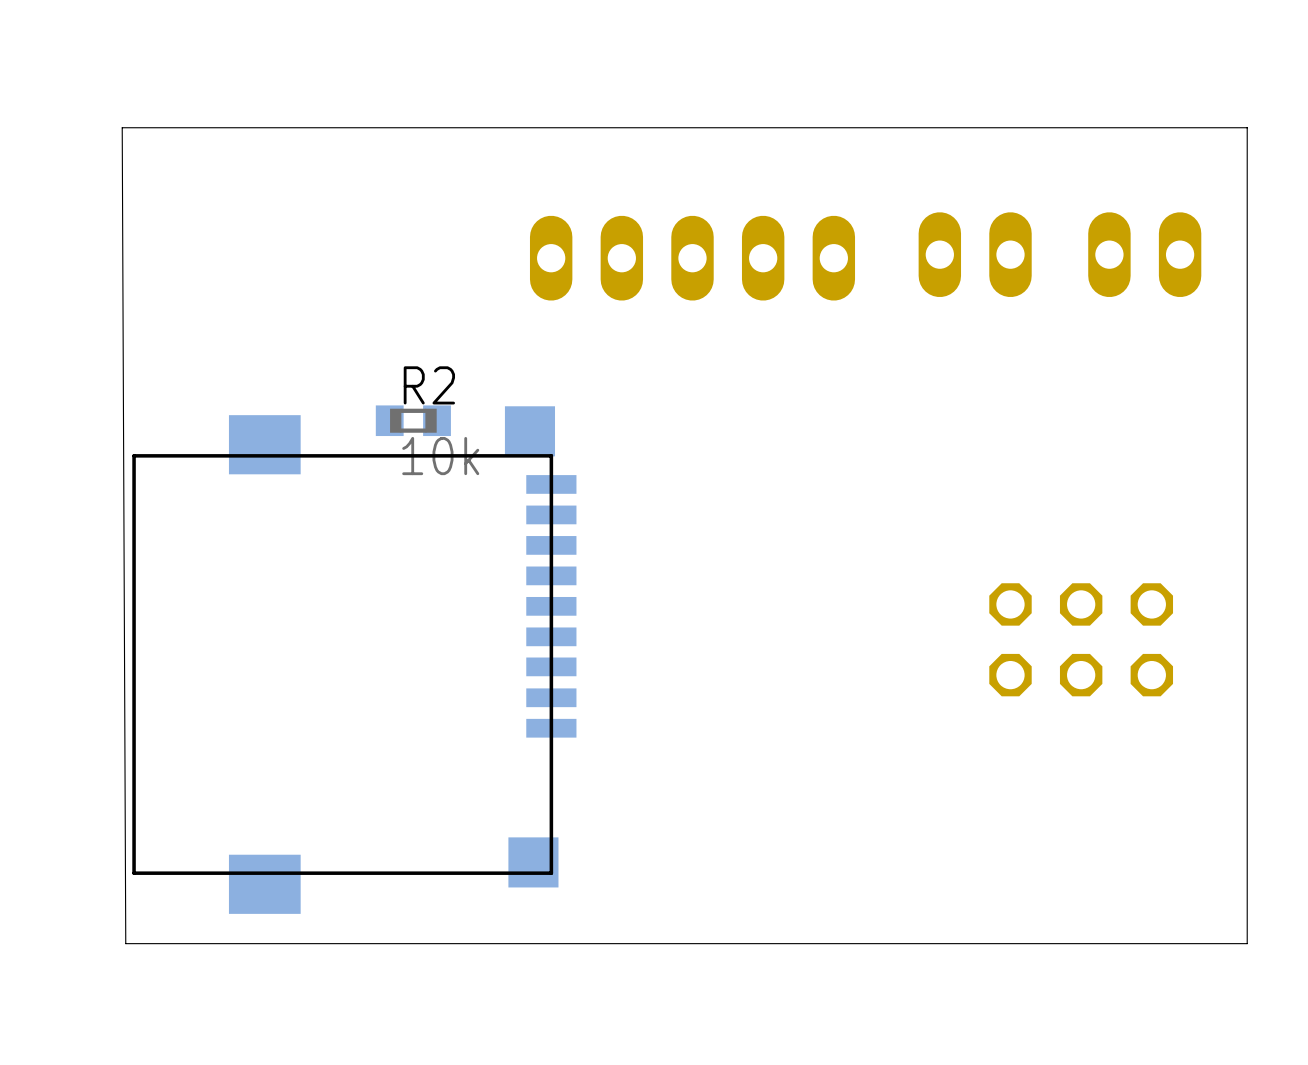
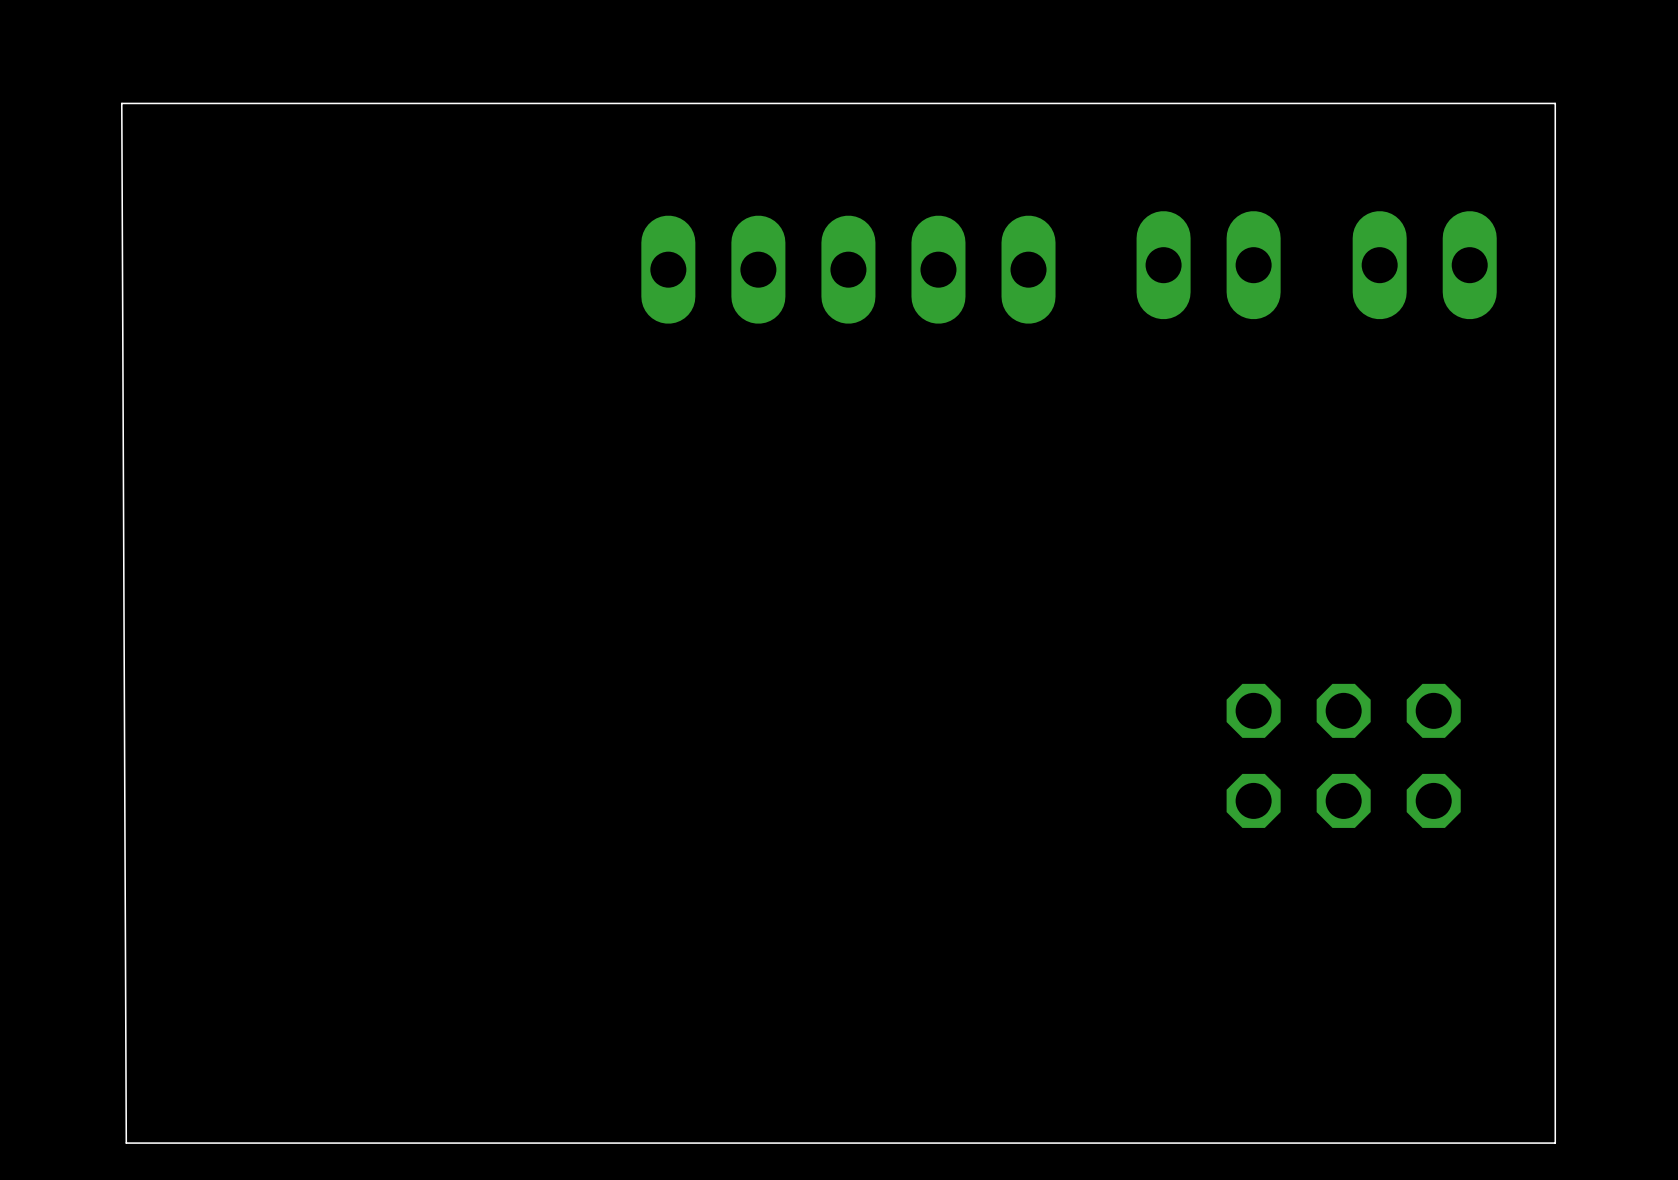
R2: 10k (413, 420) -> none
part: (354, 660) -> none

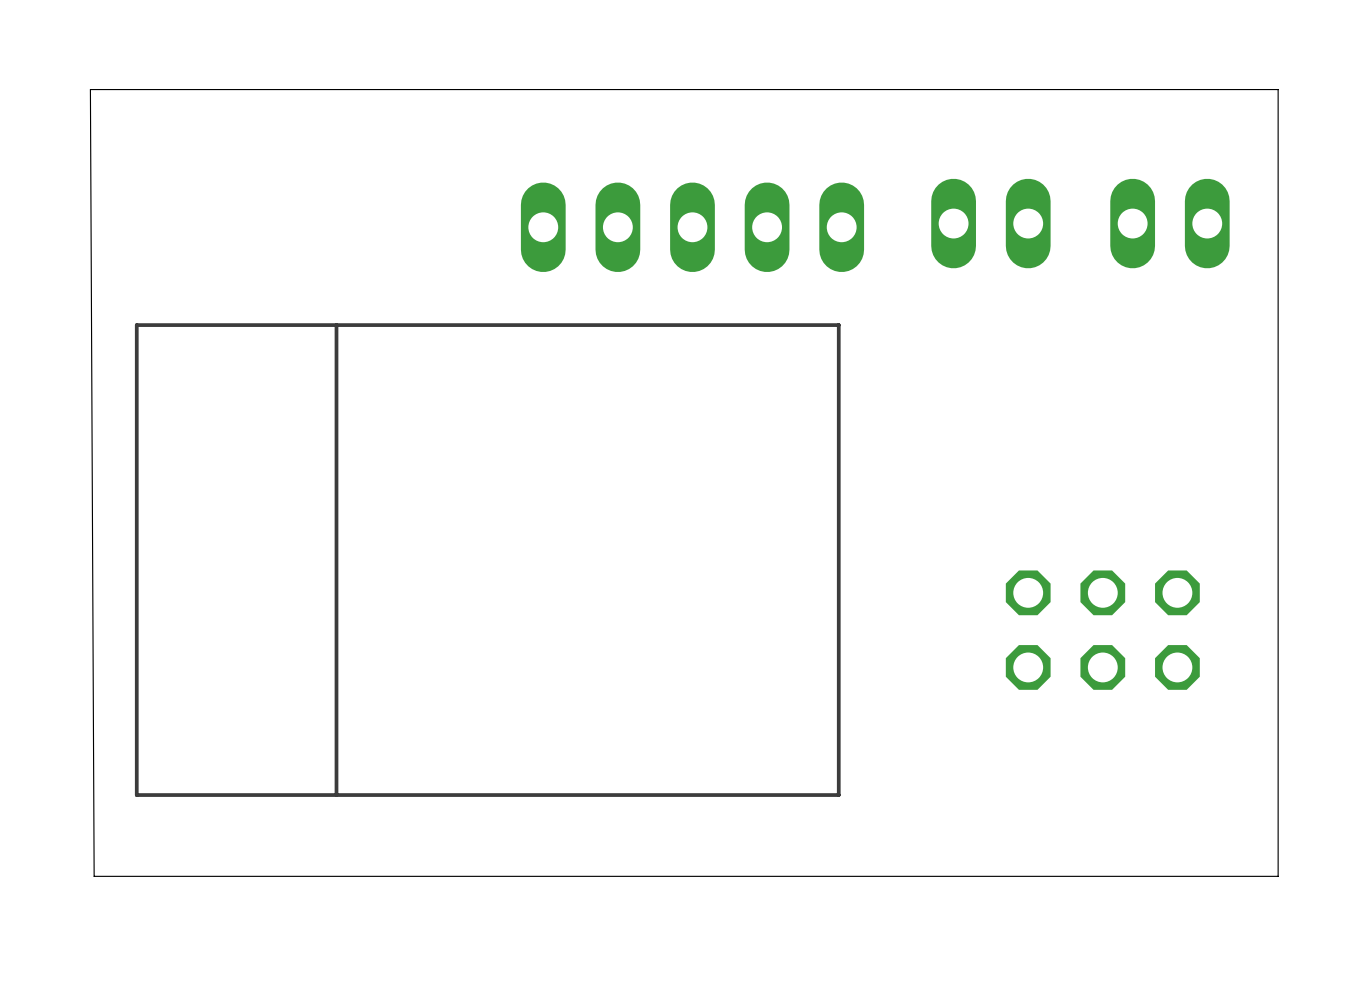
board edge: (121, 103) (126, 1143) (1555, 1143) (1555, 1053) -> (90, 89) (94, 876) (1278, 876)
part: none -> (487, 560)

